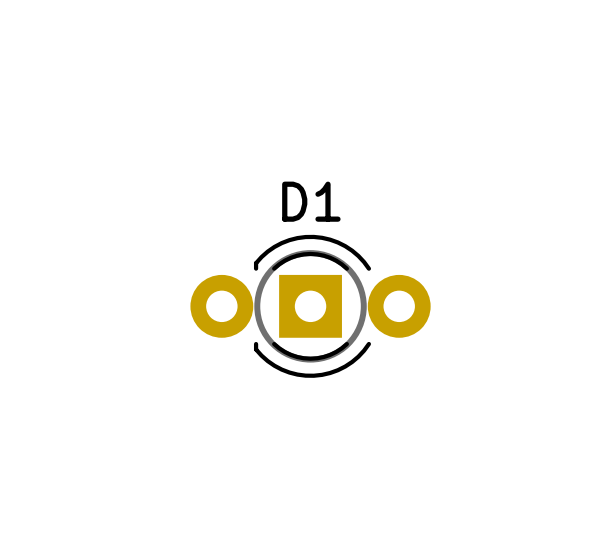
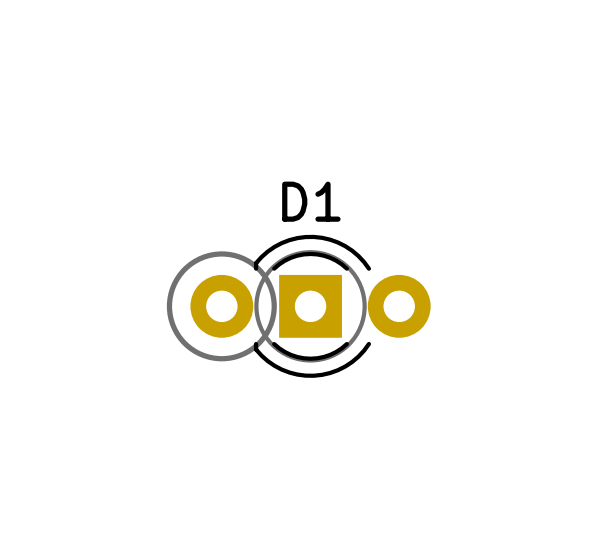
D1 footprint: [190, 234, 431, 378] -> [166, 234, 431, 378]

